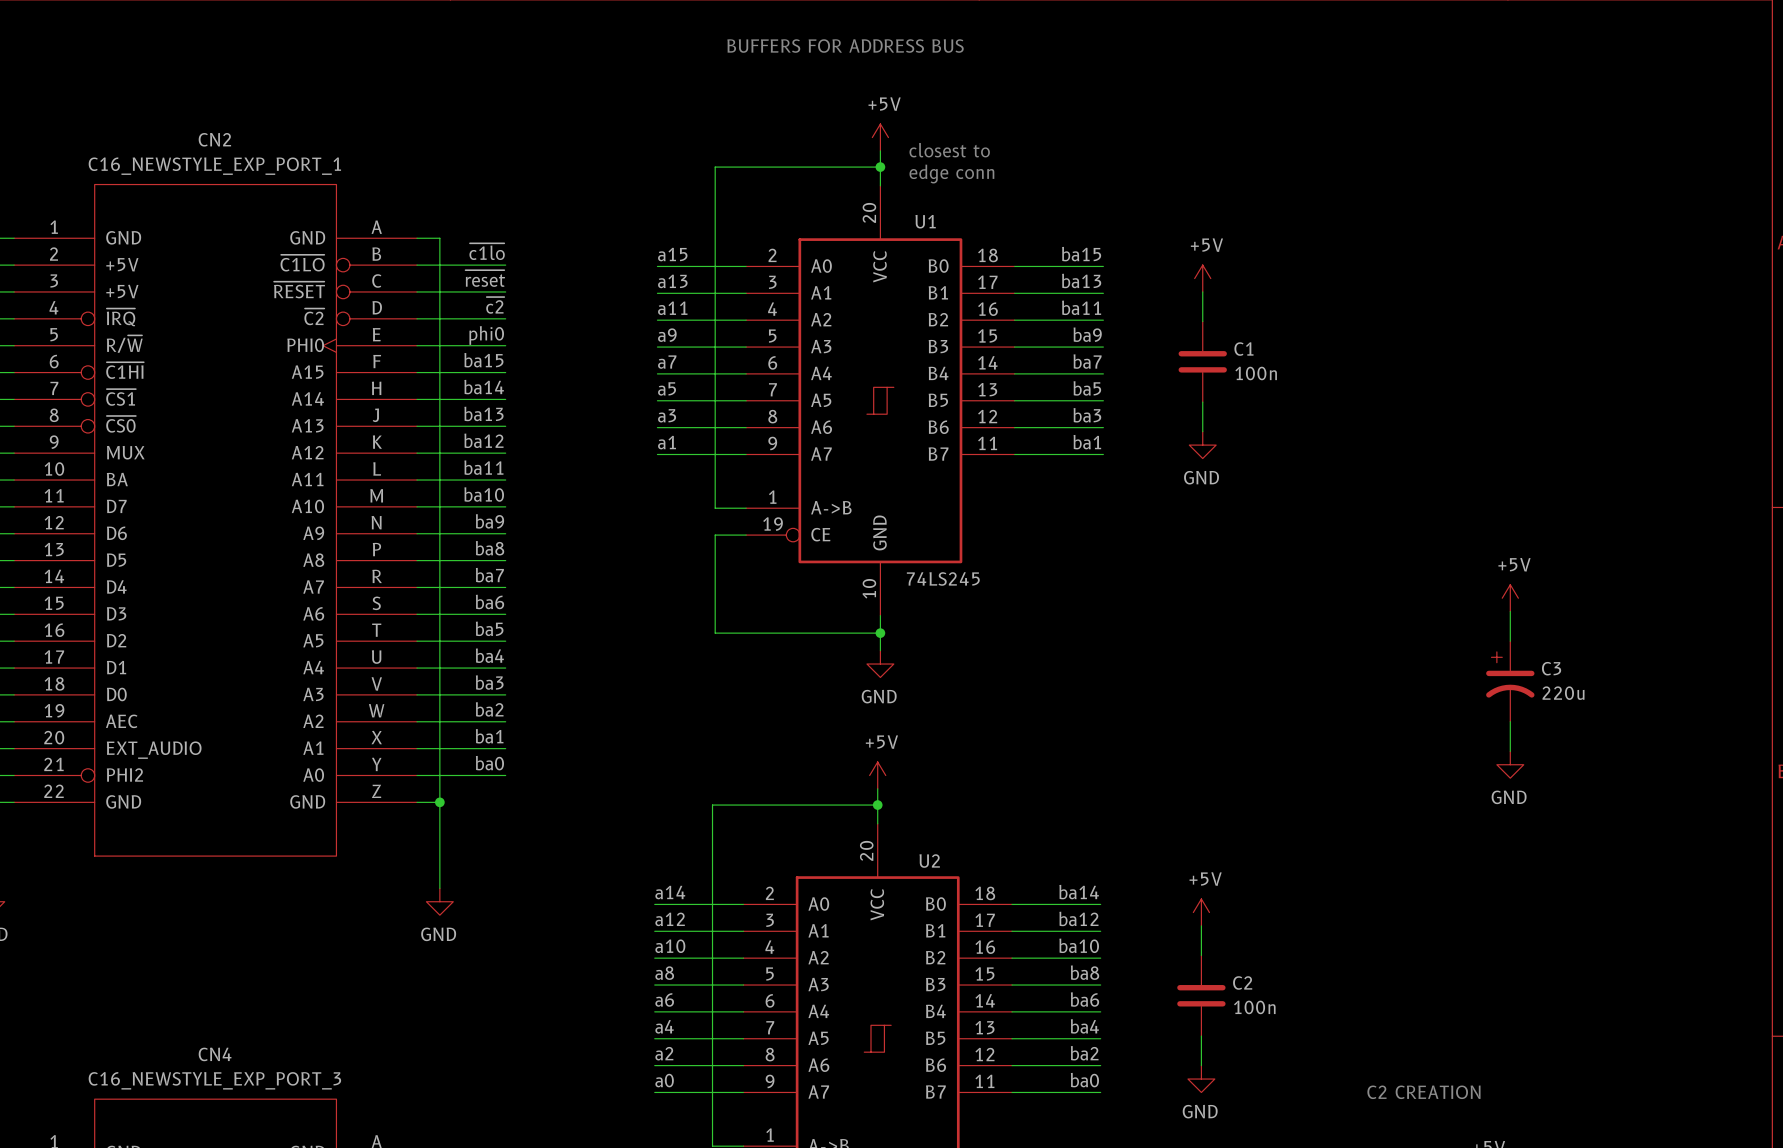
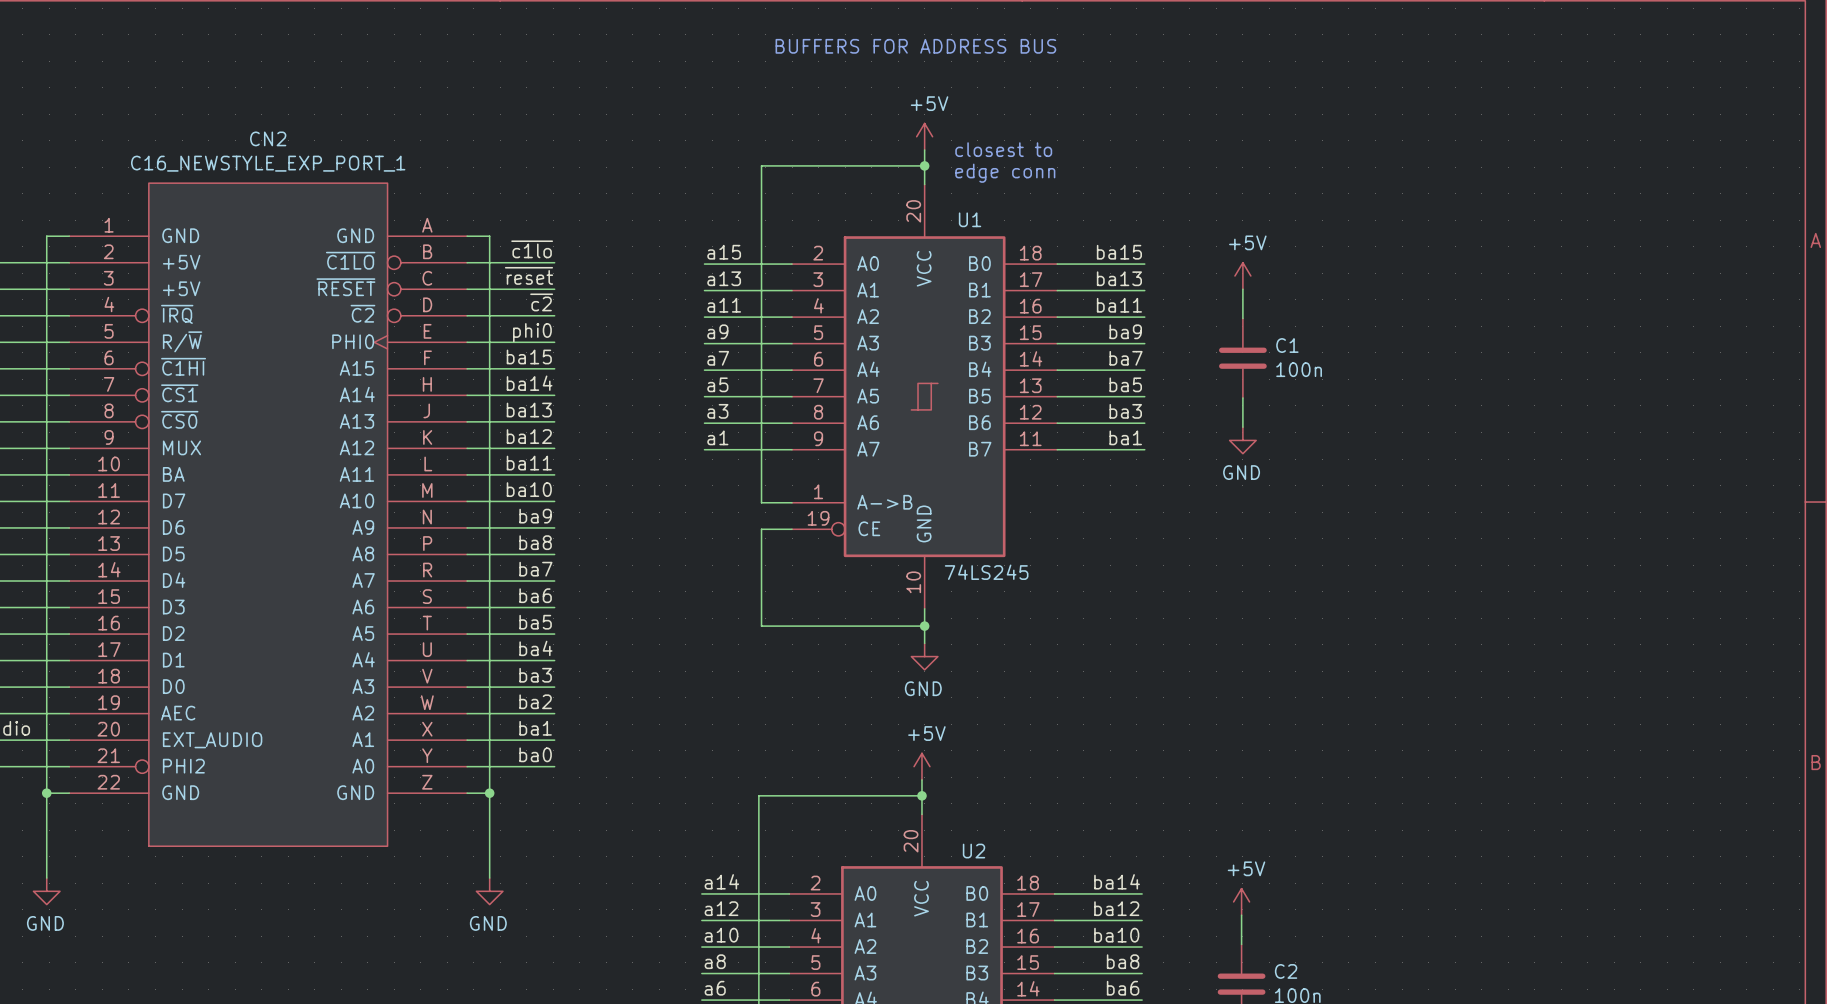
power symbol: +5V (1510, 598) -> none
wire: (1510, 611) (1510, 641) -> none
C3: 220u (1510, 681) -> none
wire: (1510, 721) (1510, 751) -> none
power symbol: GND (1510, 764) -> none

